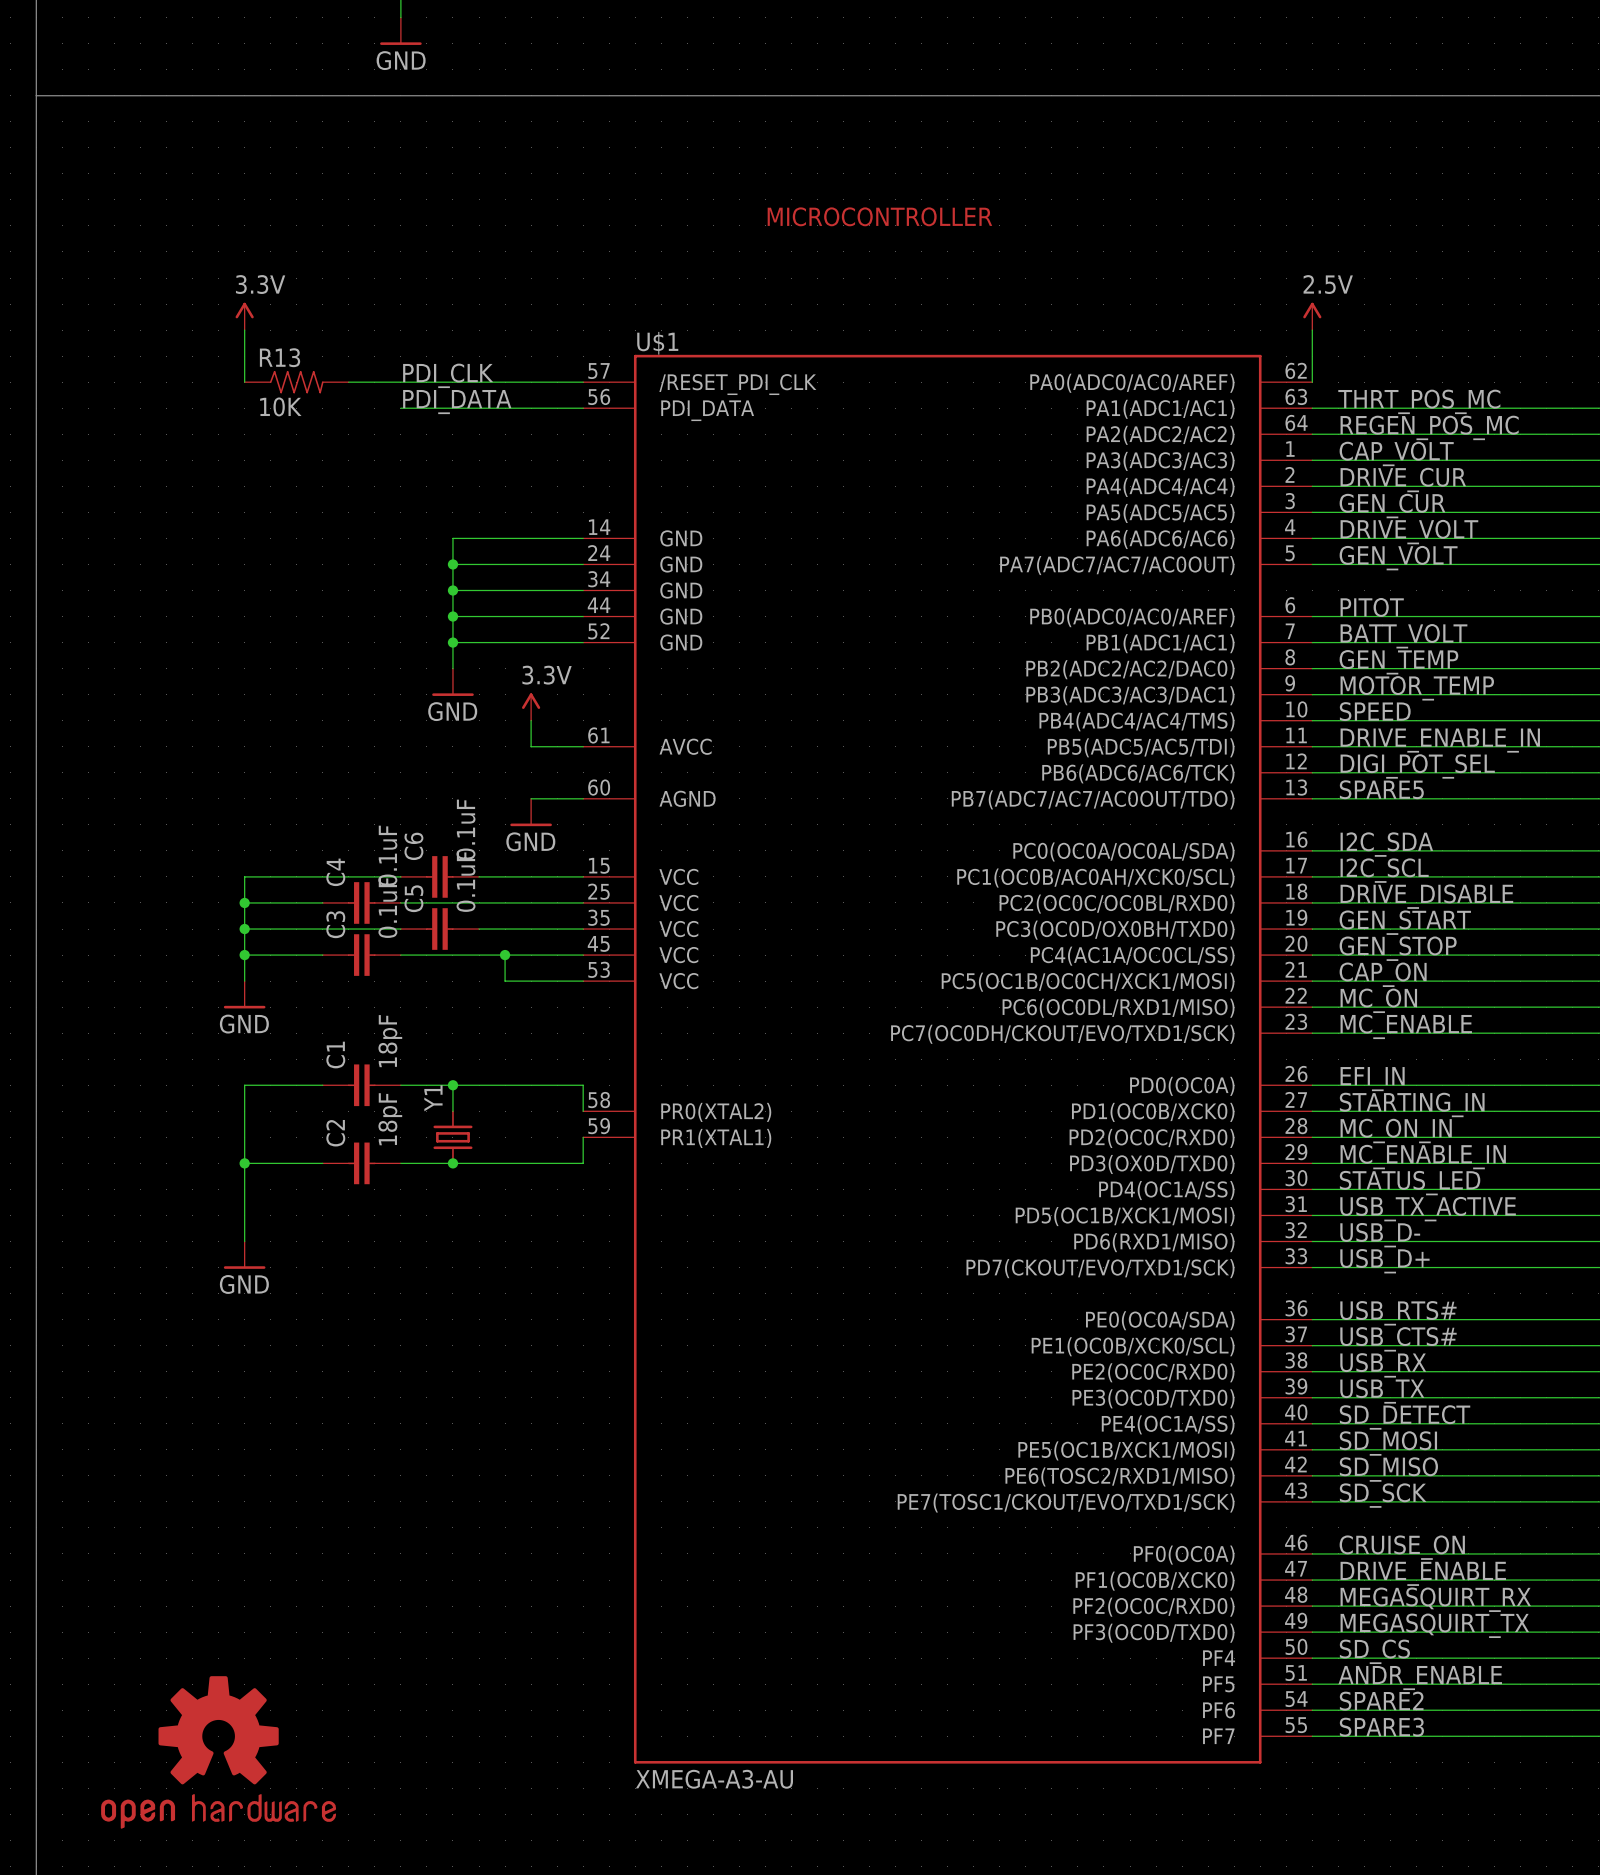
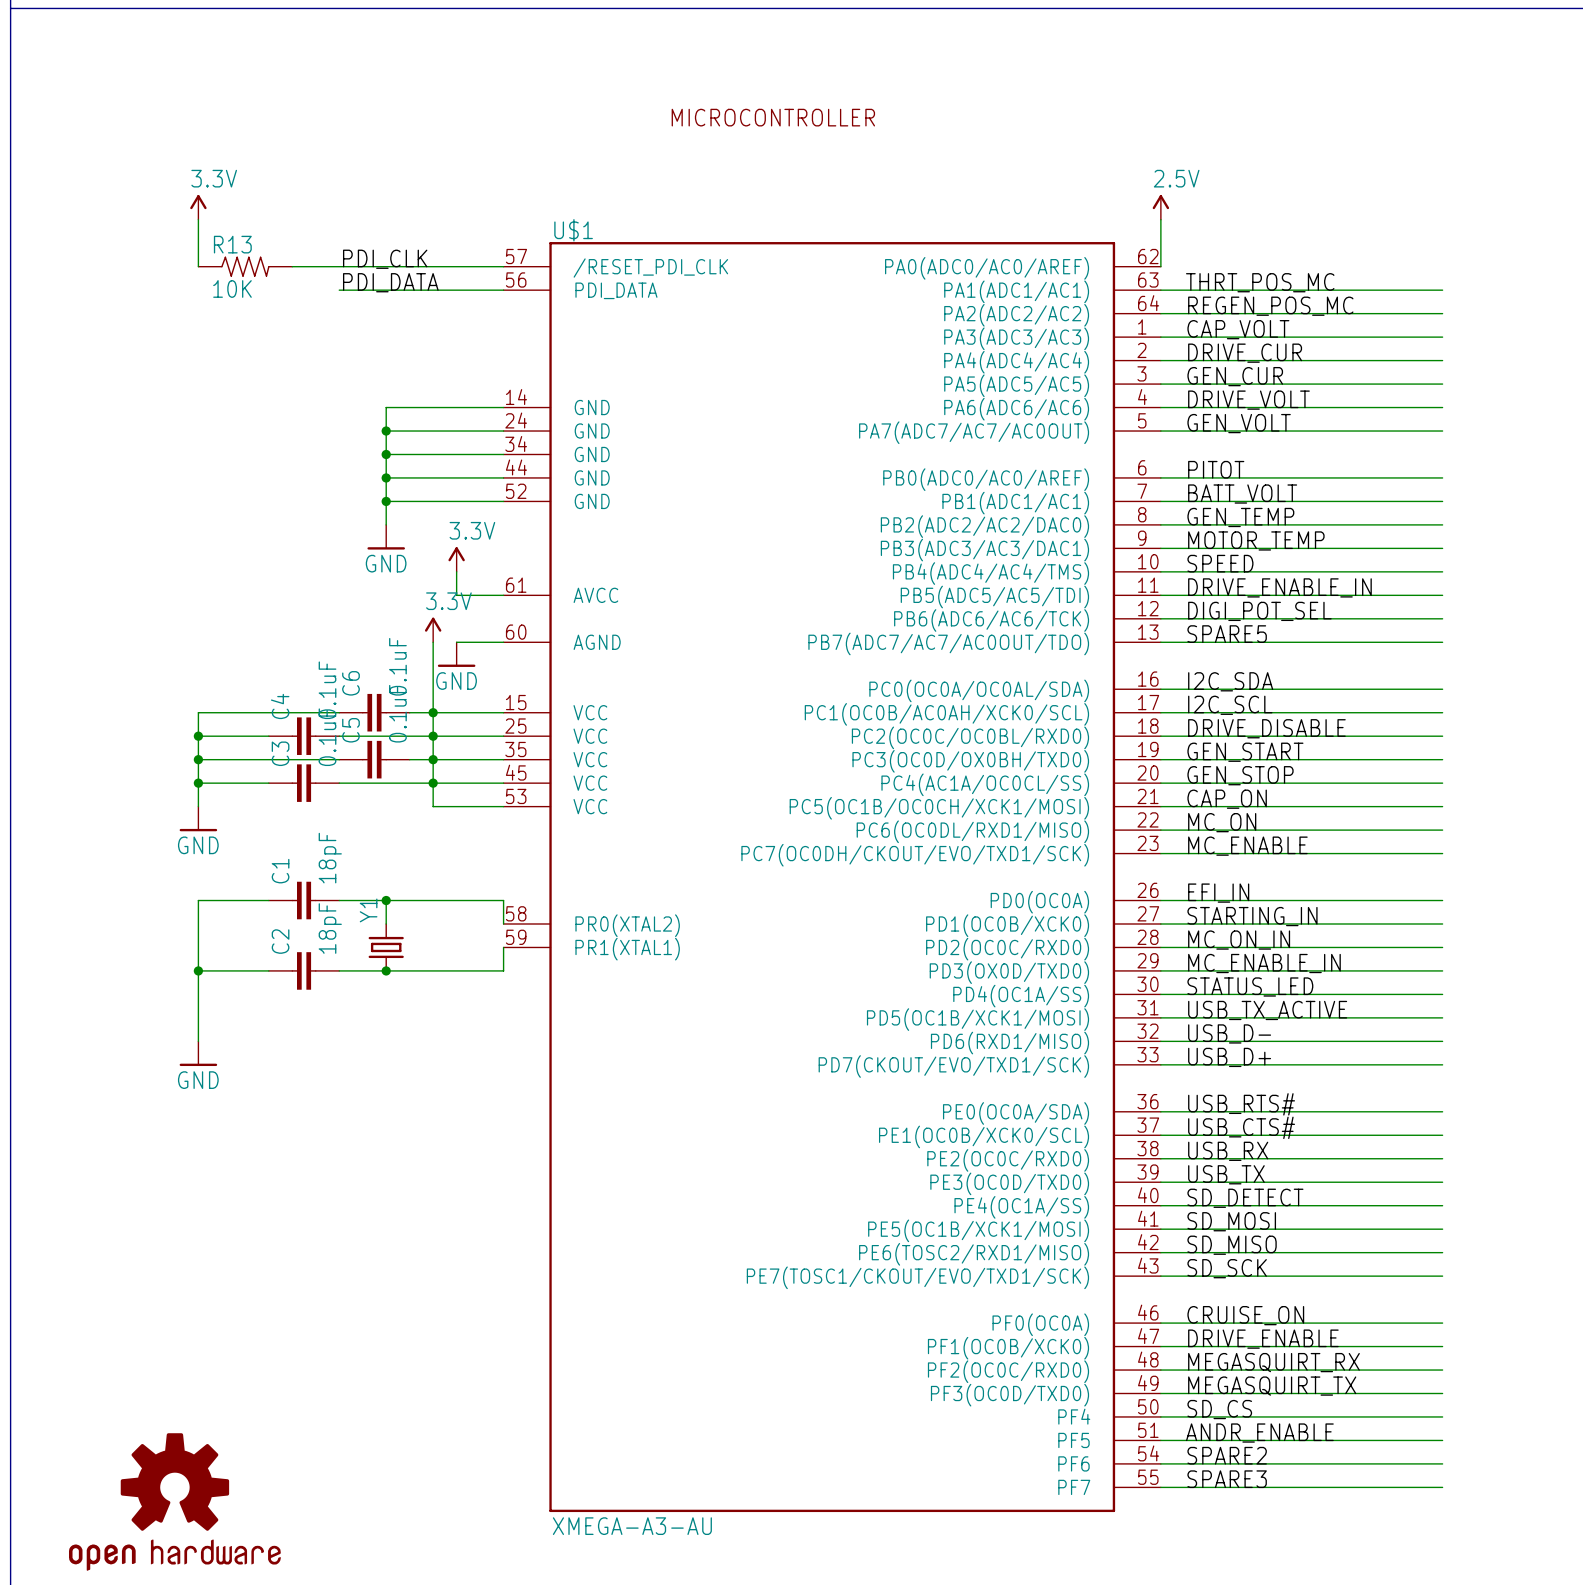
power symbol: none -> 3.3V (433, 629)
wire: none -> (433, 642) (433, 783)
junction: none -> (433, 712)
junction: none -> (433, 736)
junction: none -> (433, 759)

